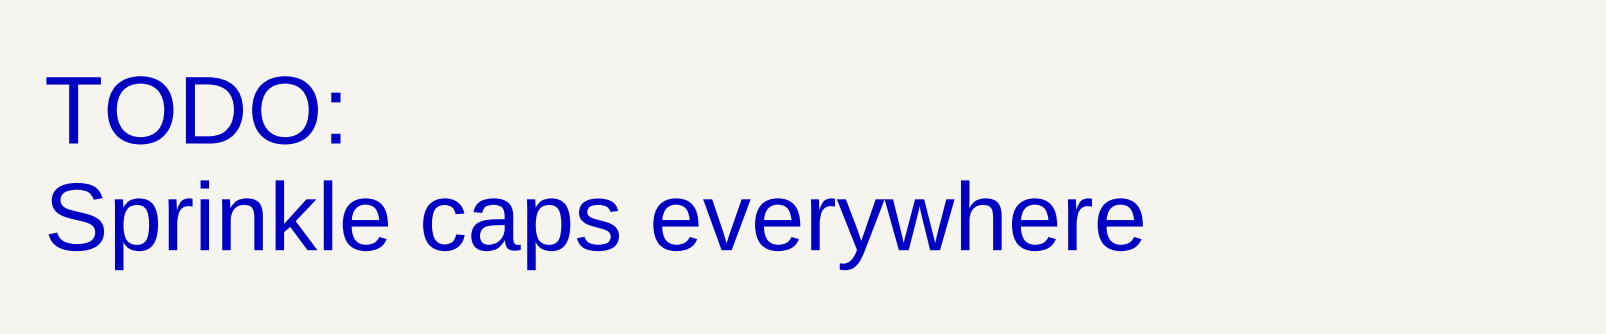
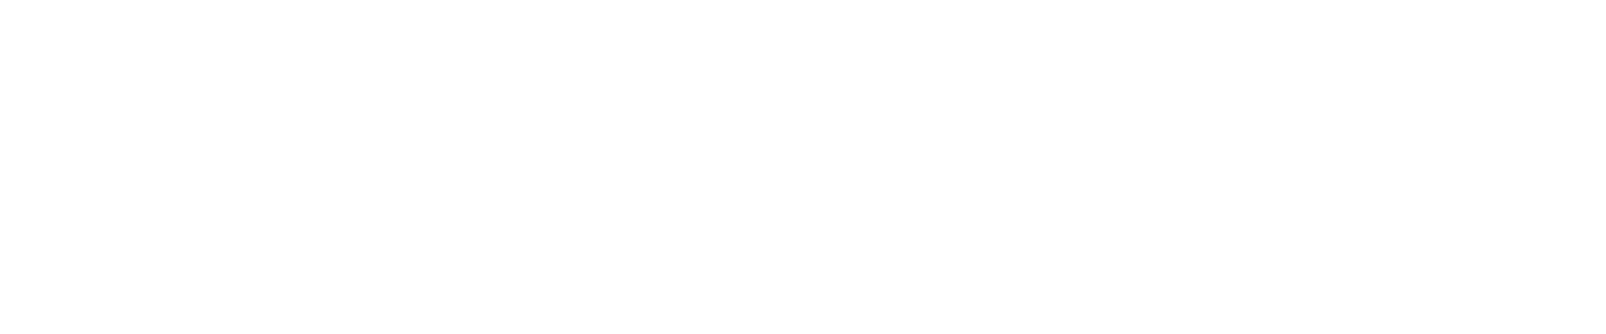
text: TODO: (193, 110) -> none
text: Sprinkle caps everywhere (595, 225) -> none

